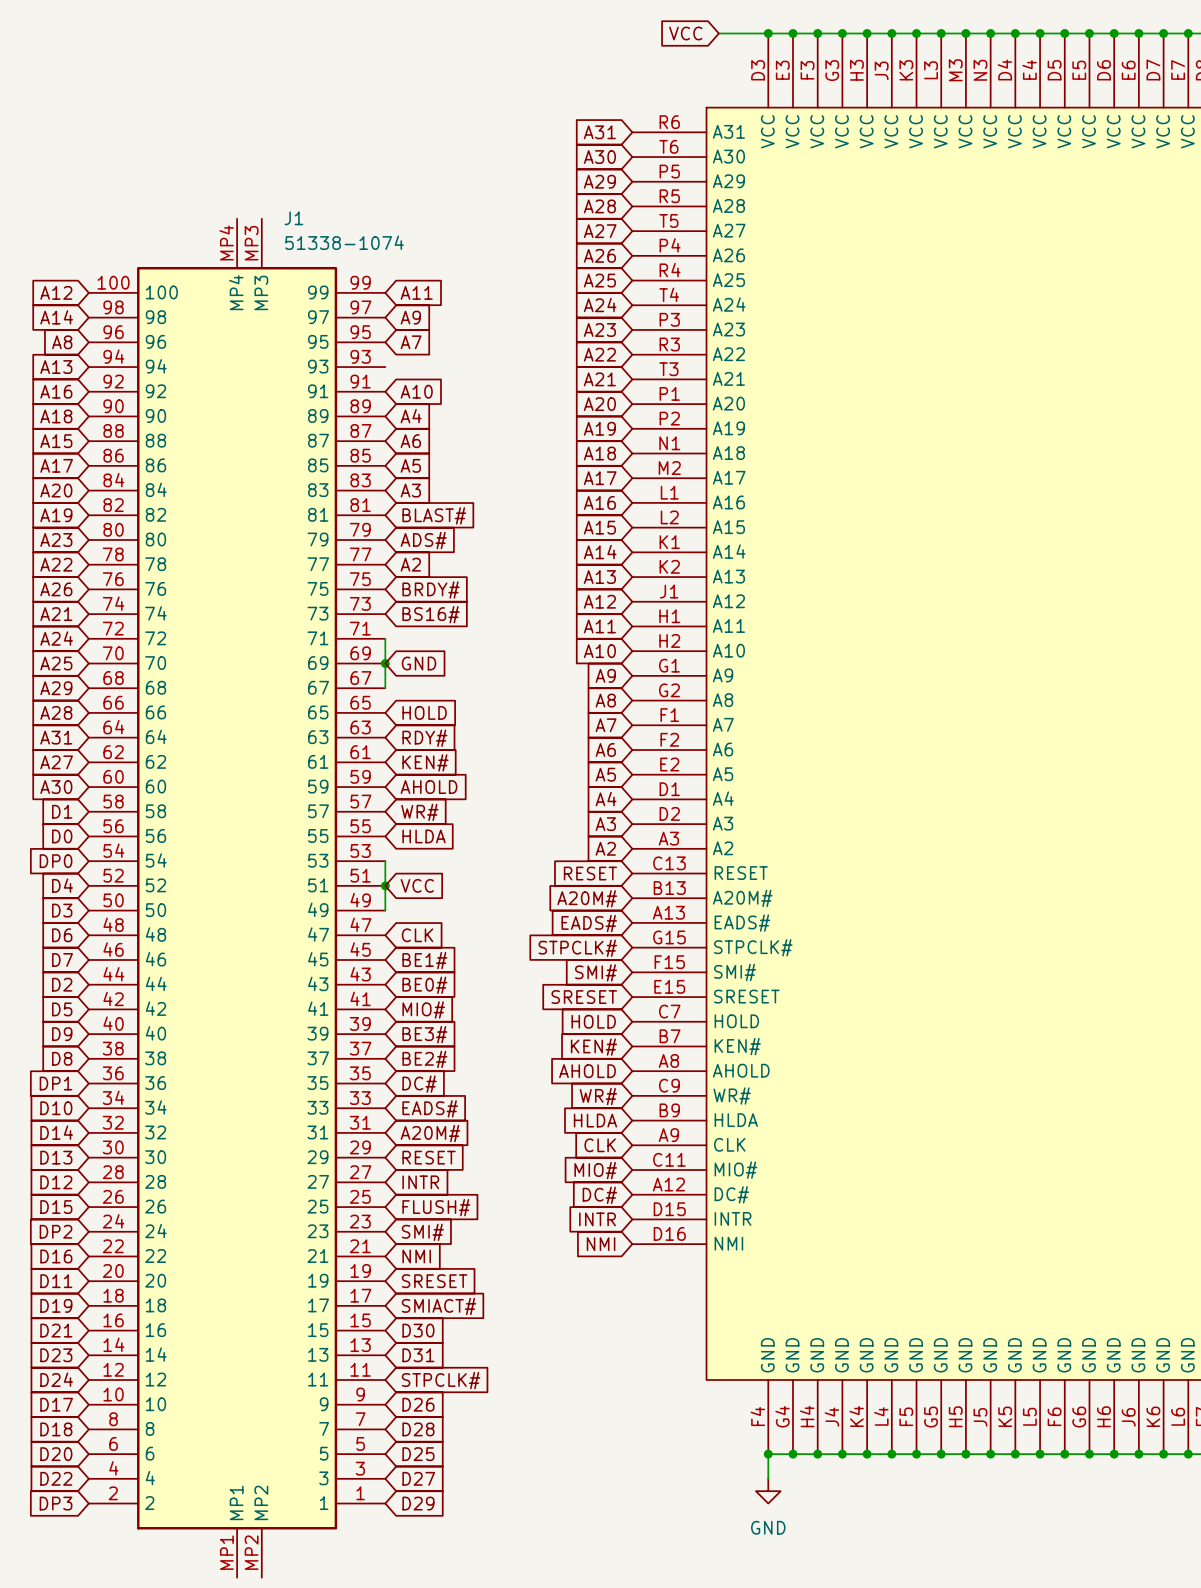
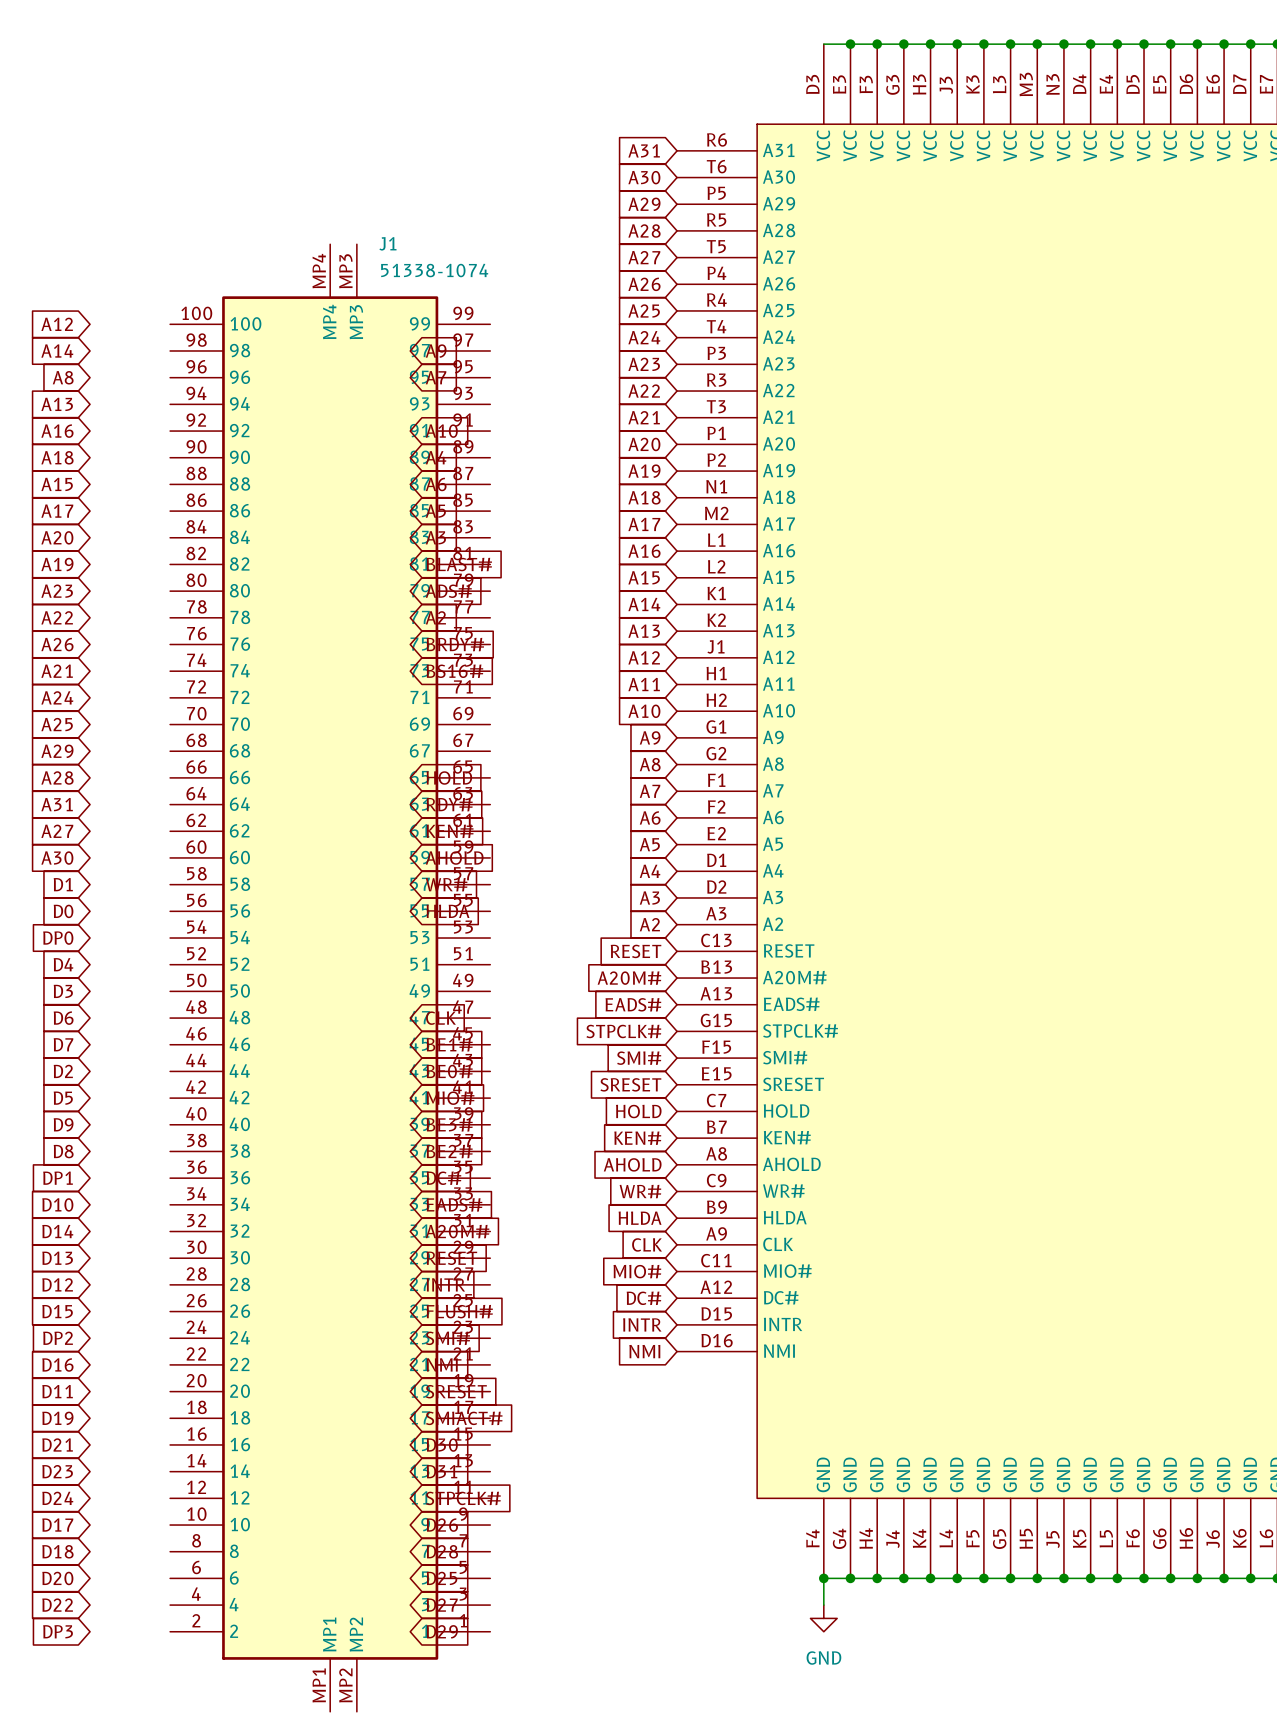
global label: VCC (685, 33) -> none
wire: (718, 33) (768, 33) -> none
junction: (768, 33) -> none
global label: A11 (416, 292) -> none
junction: (385, 663) -> none
global label: GND (419, 663) -> none
junction: (385, 885) -> none
global label: VCC (417, 885) -> none
J1 position: (237, 898) -> (330, 978)

